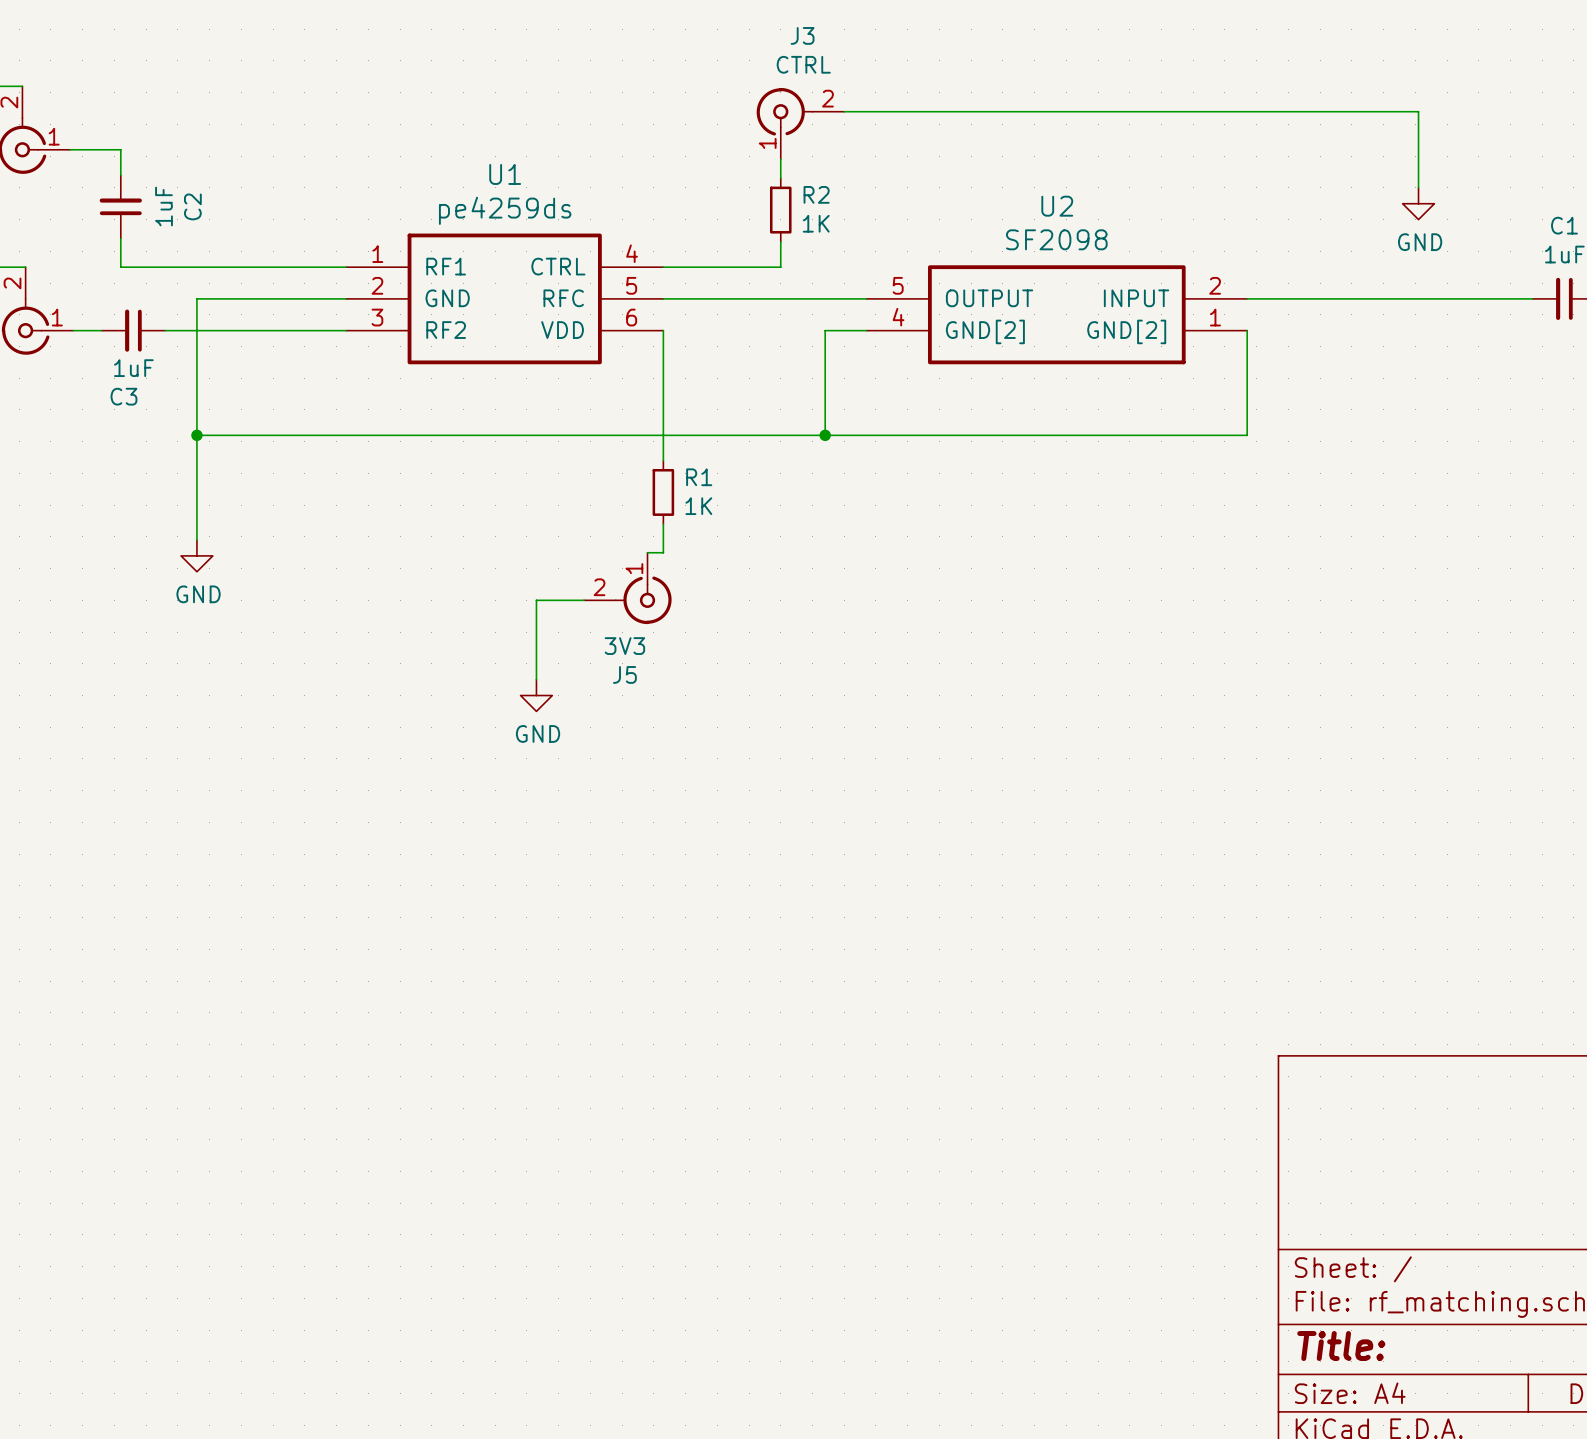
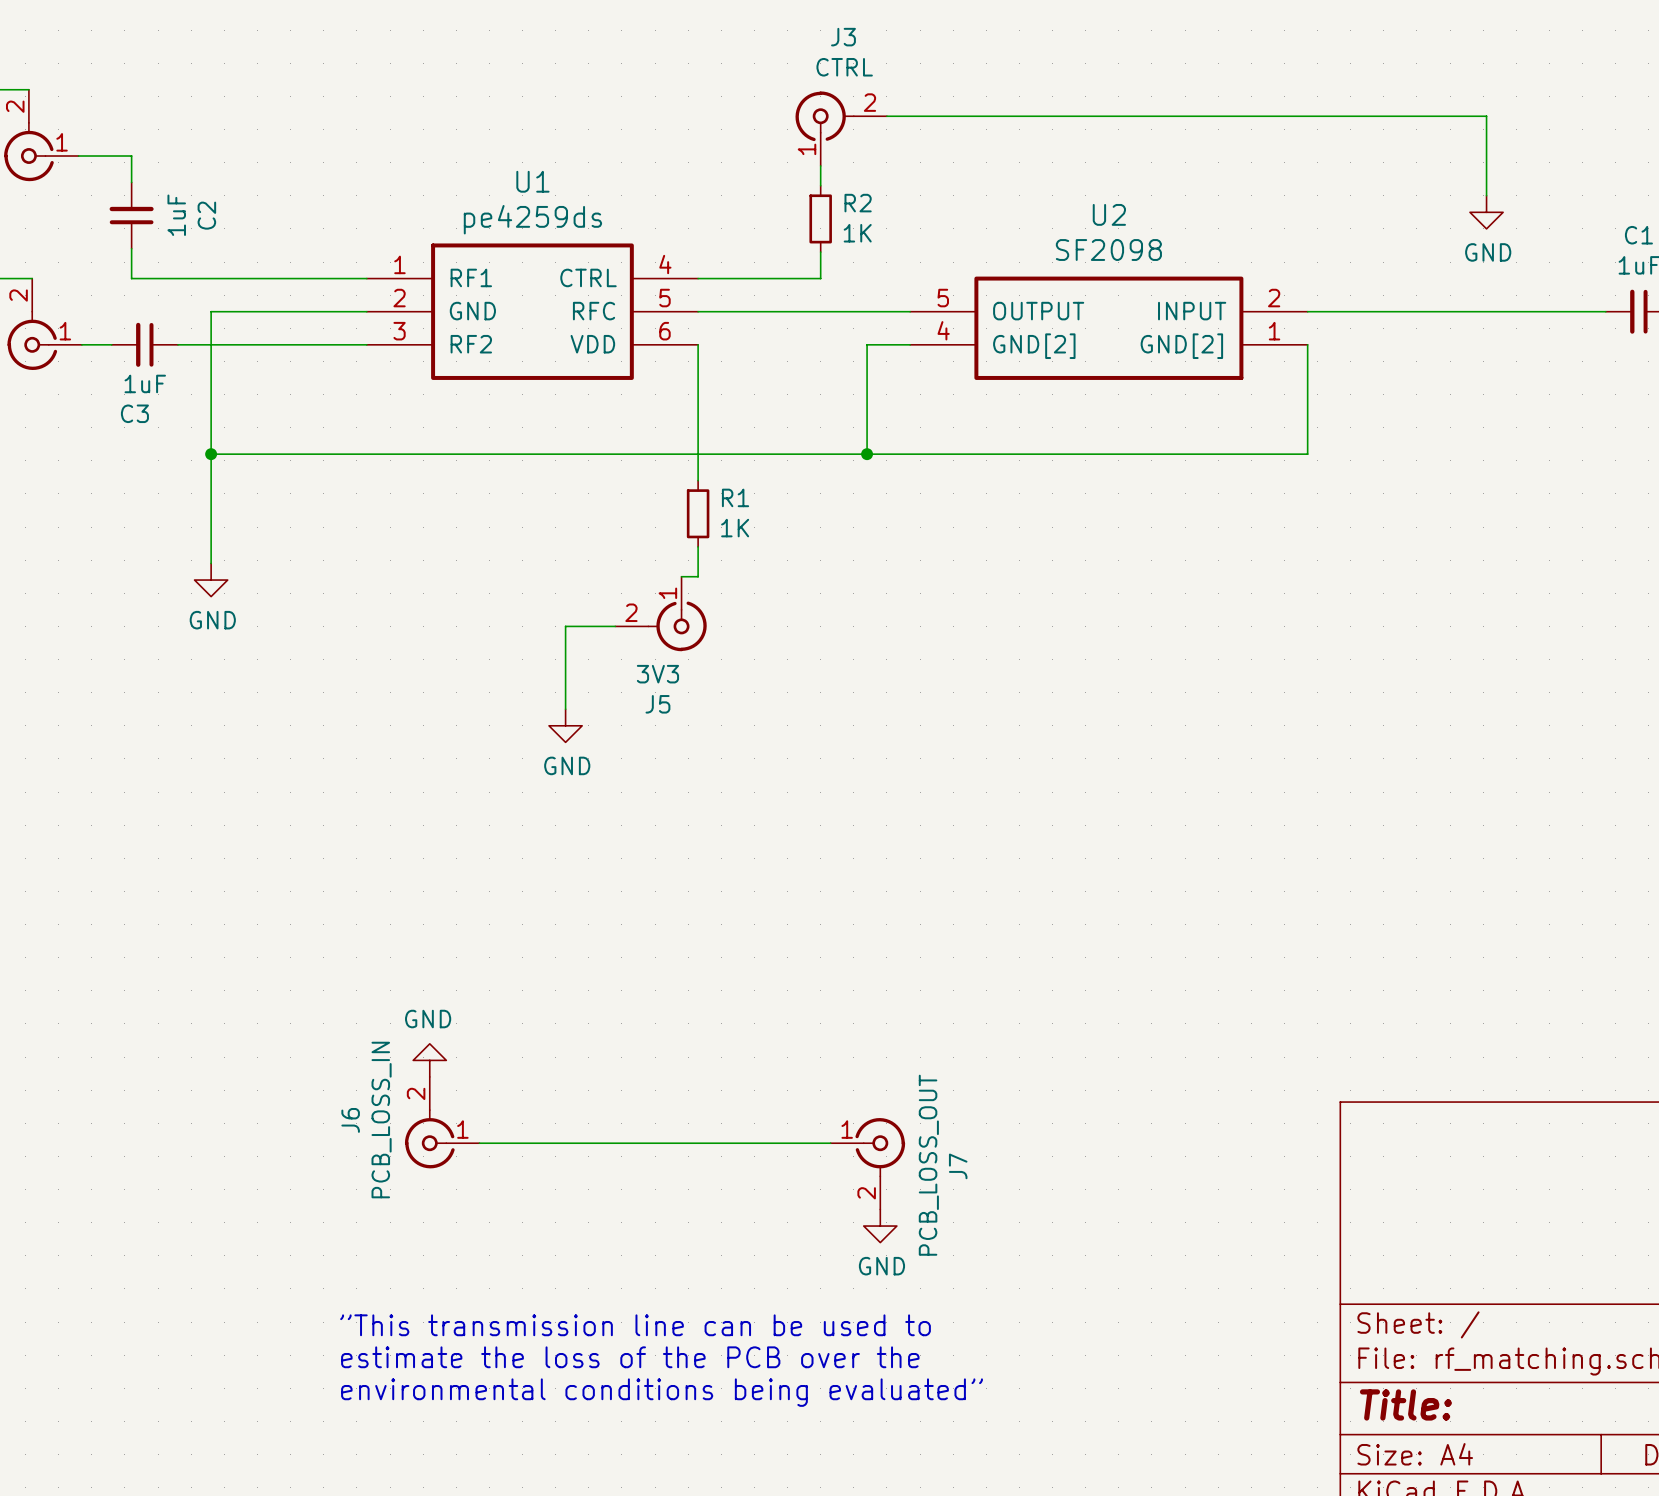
power symbol: none -> GND (429, 1060)
J6: none -> PCB_LOSS_IN (442, 1122)
wire: none -> (479, 1143) (830, 1143)
J7: none -> PCB_LOSS_OUT (867, 1163)
power symbol: none -> GND (880, 1226)
text: none -> ”This transmission line can be used to (635, 1325)
text: none -> estimate the loss of the PCB over the (630, 1357)
text: none -> environmental conditions being evaluated” (662, 1392)

